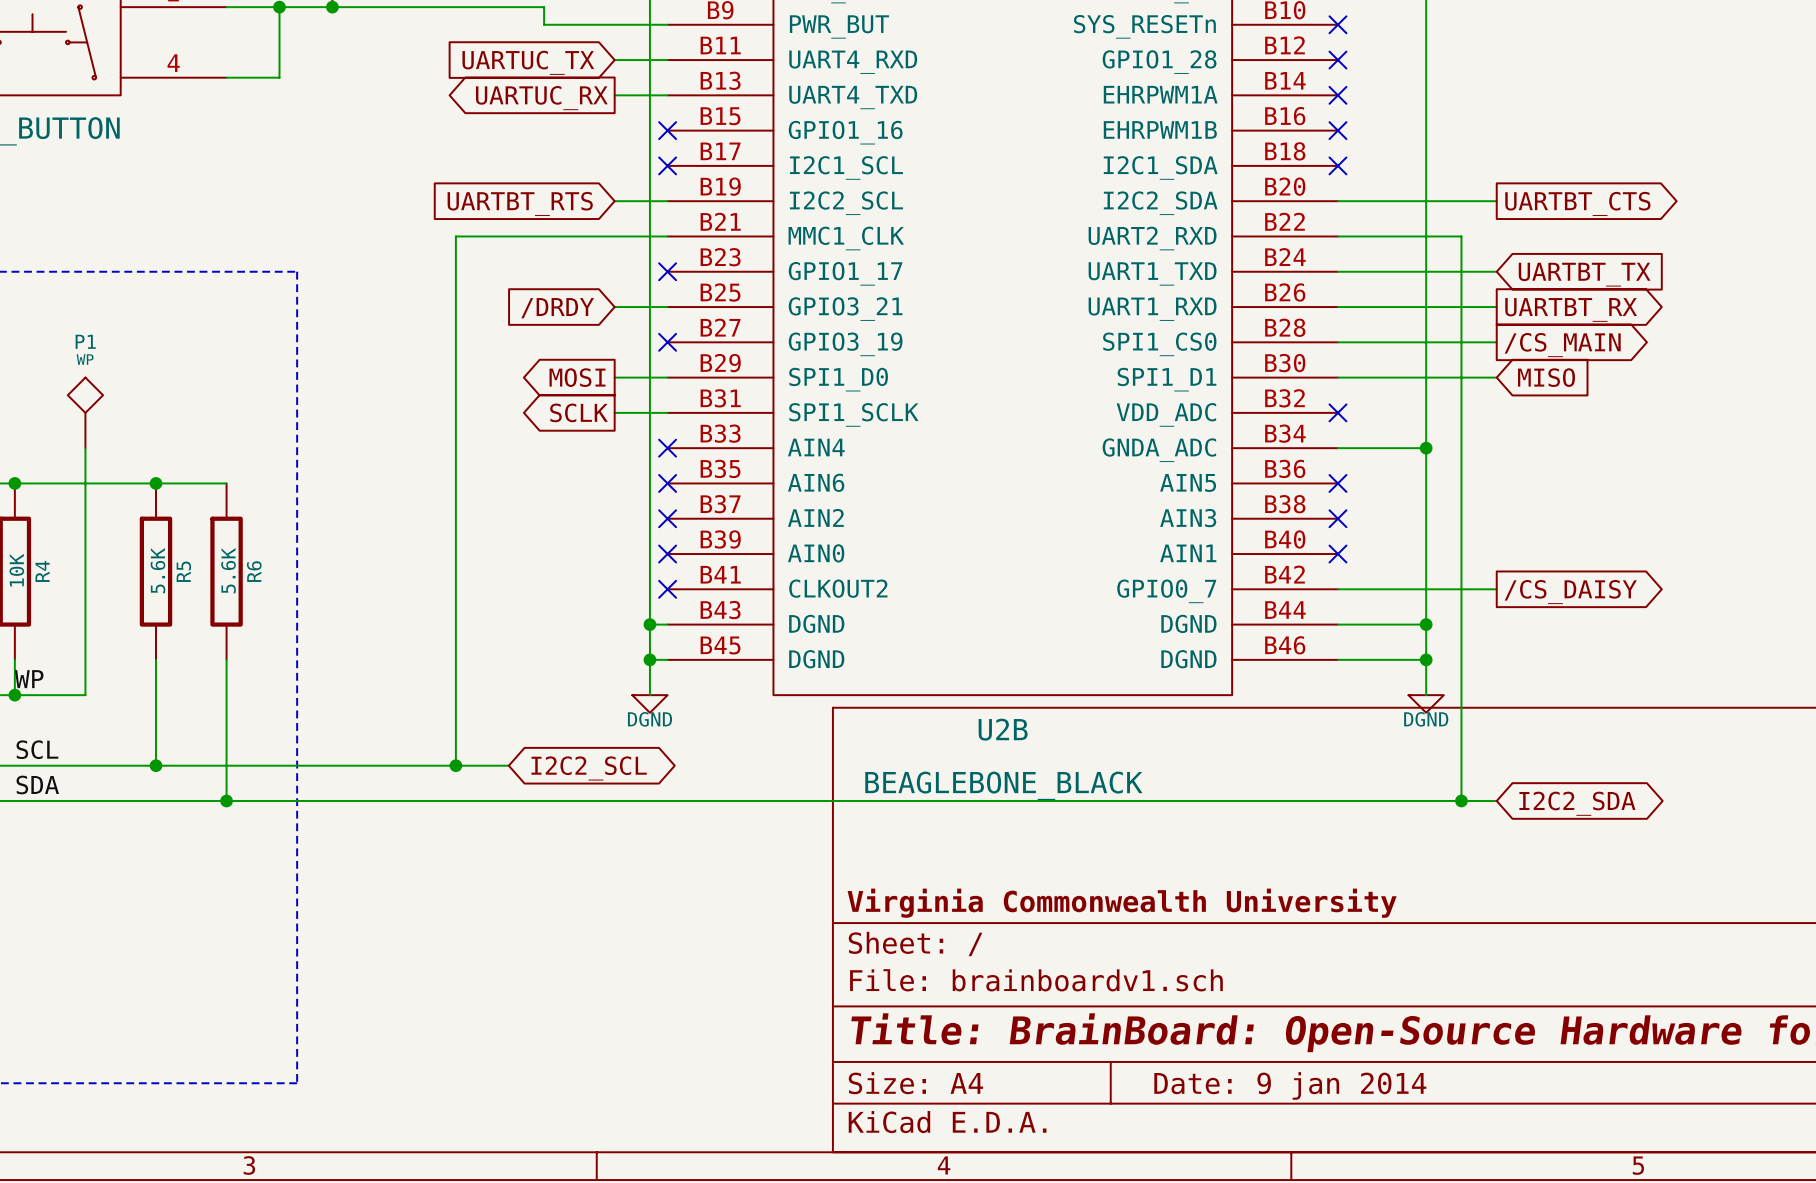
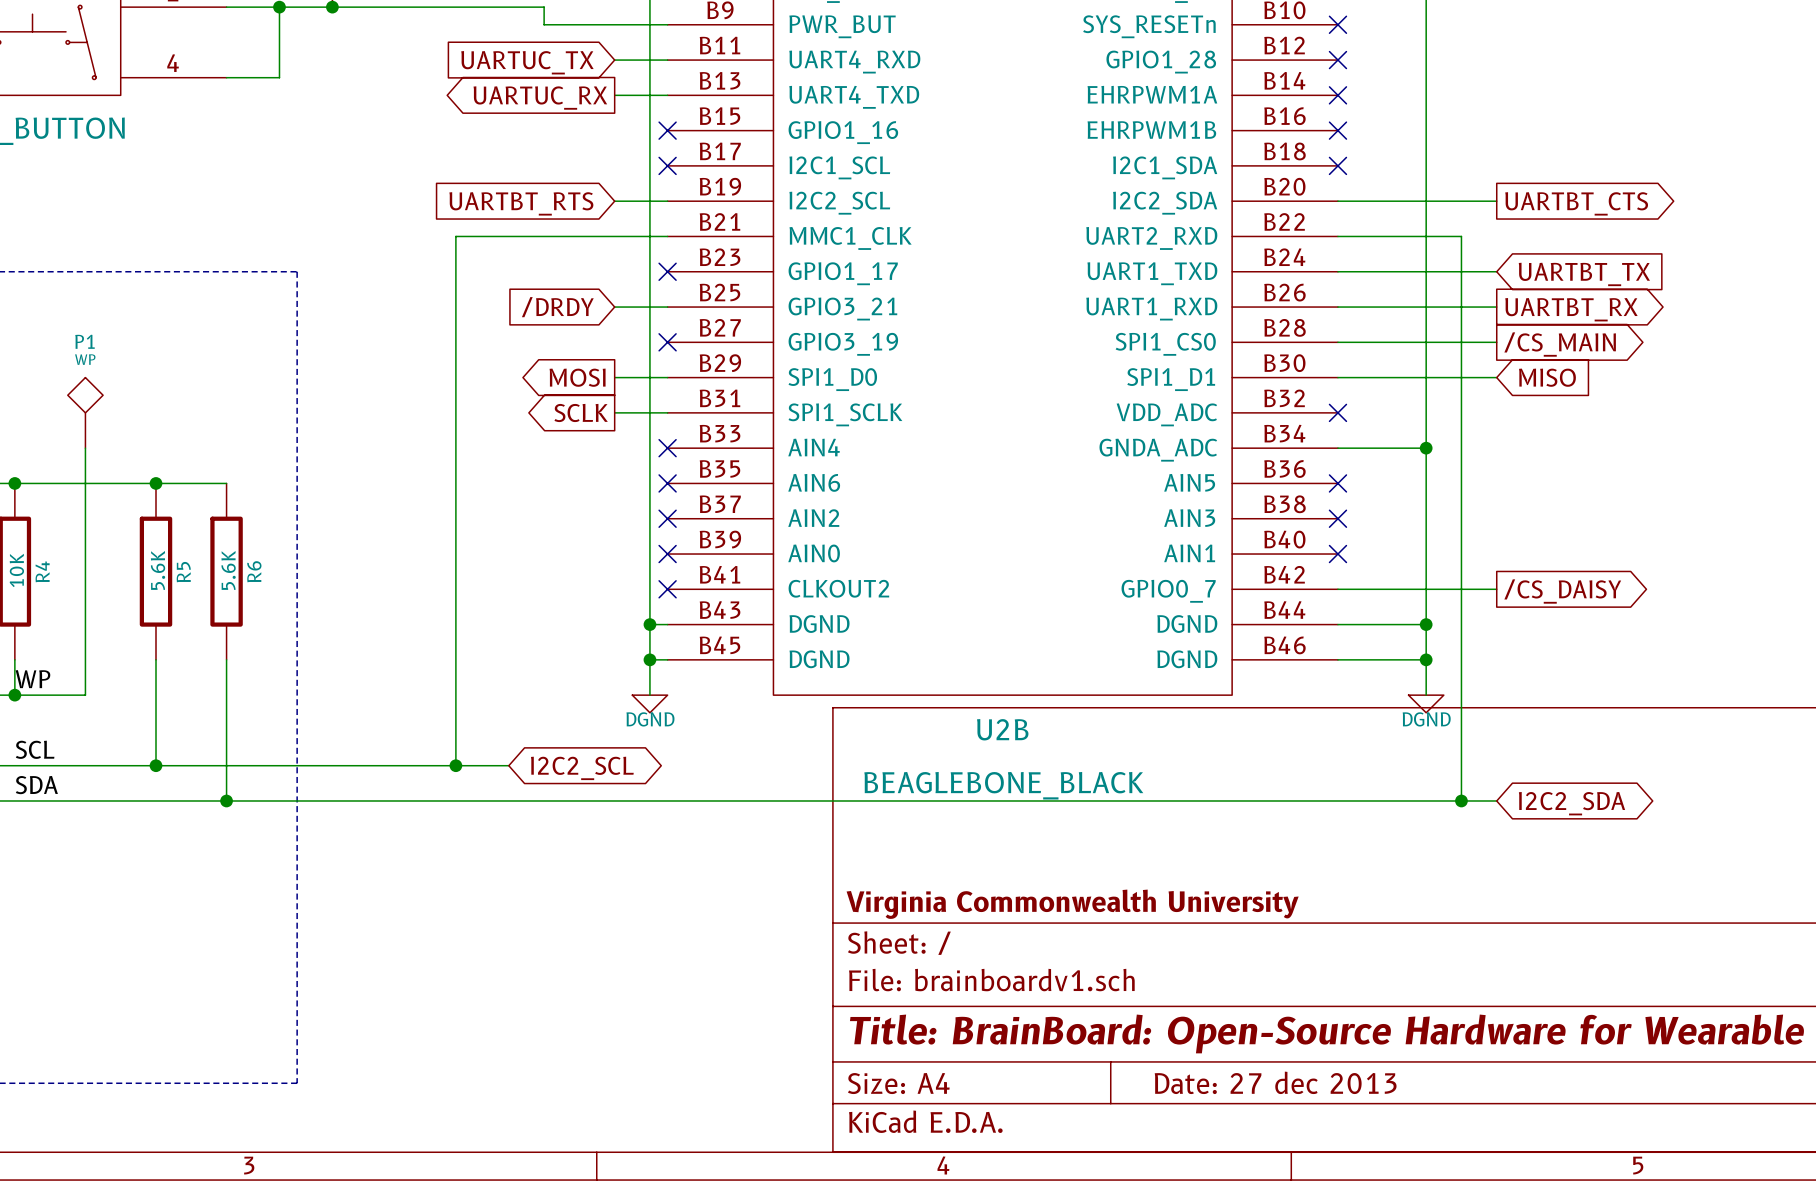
title block: Date: 9 jan 2014 (1290, 1085) -> Date: 27 dec 2013 (1275, 1082)

